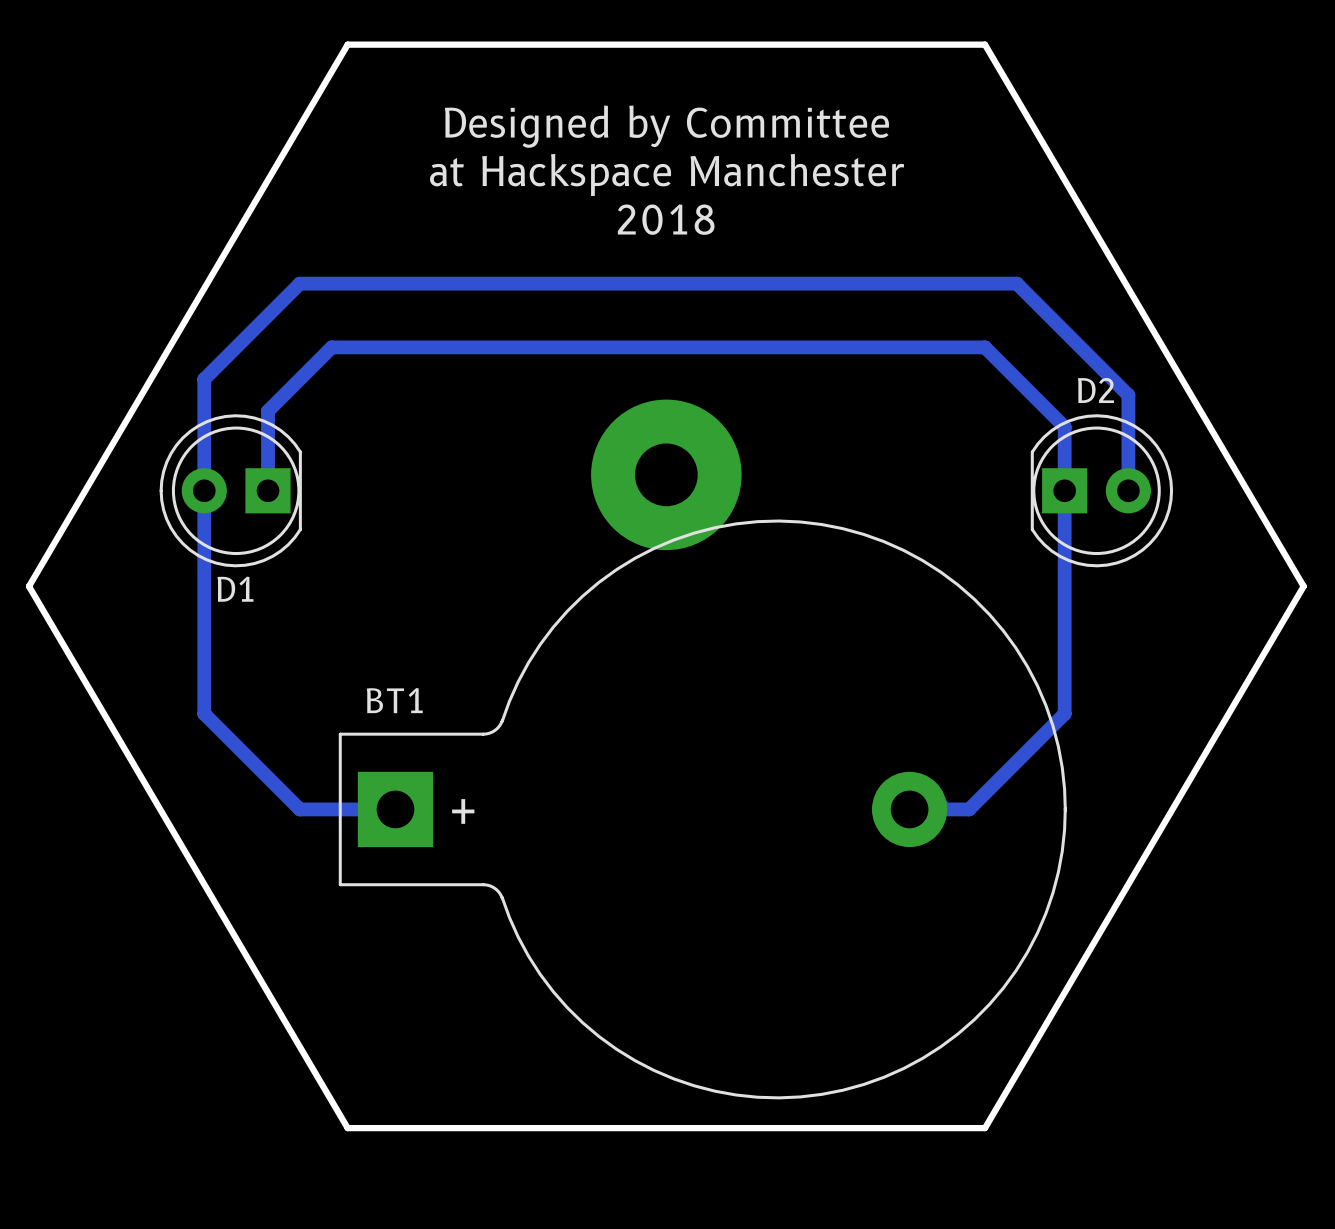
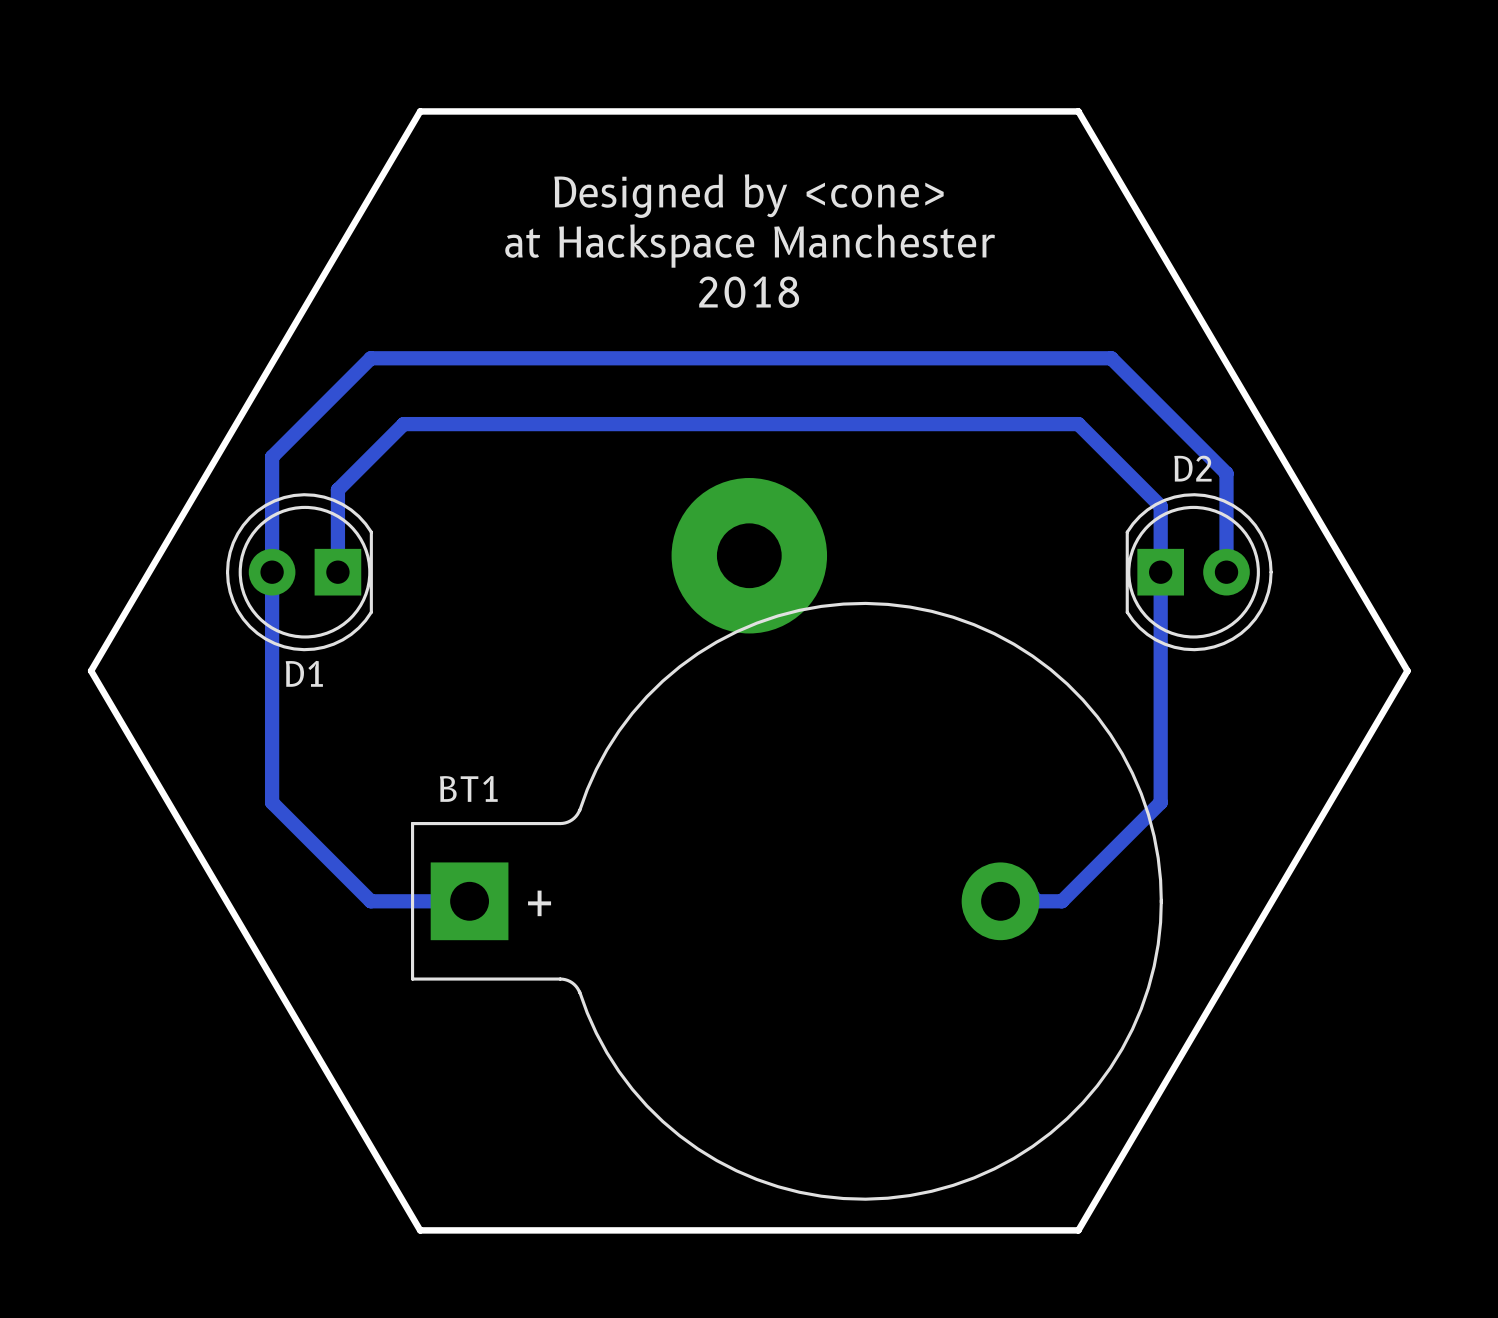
text: Designed by Committee (666, 126) -> Designed by <cone> (749, 196)

